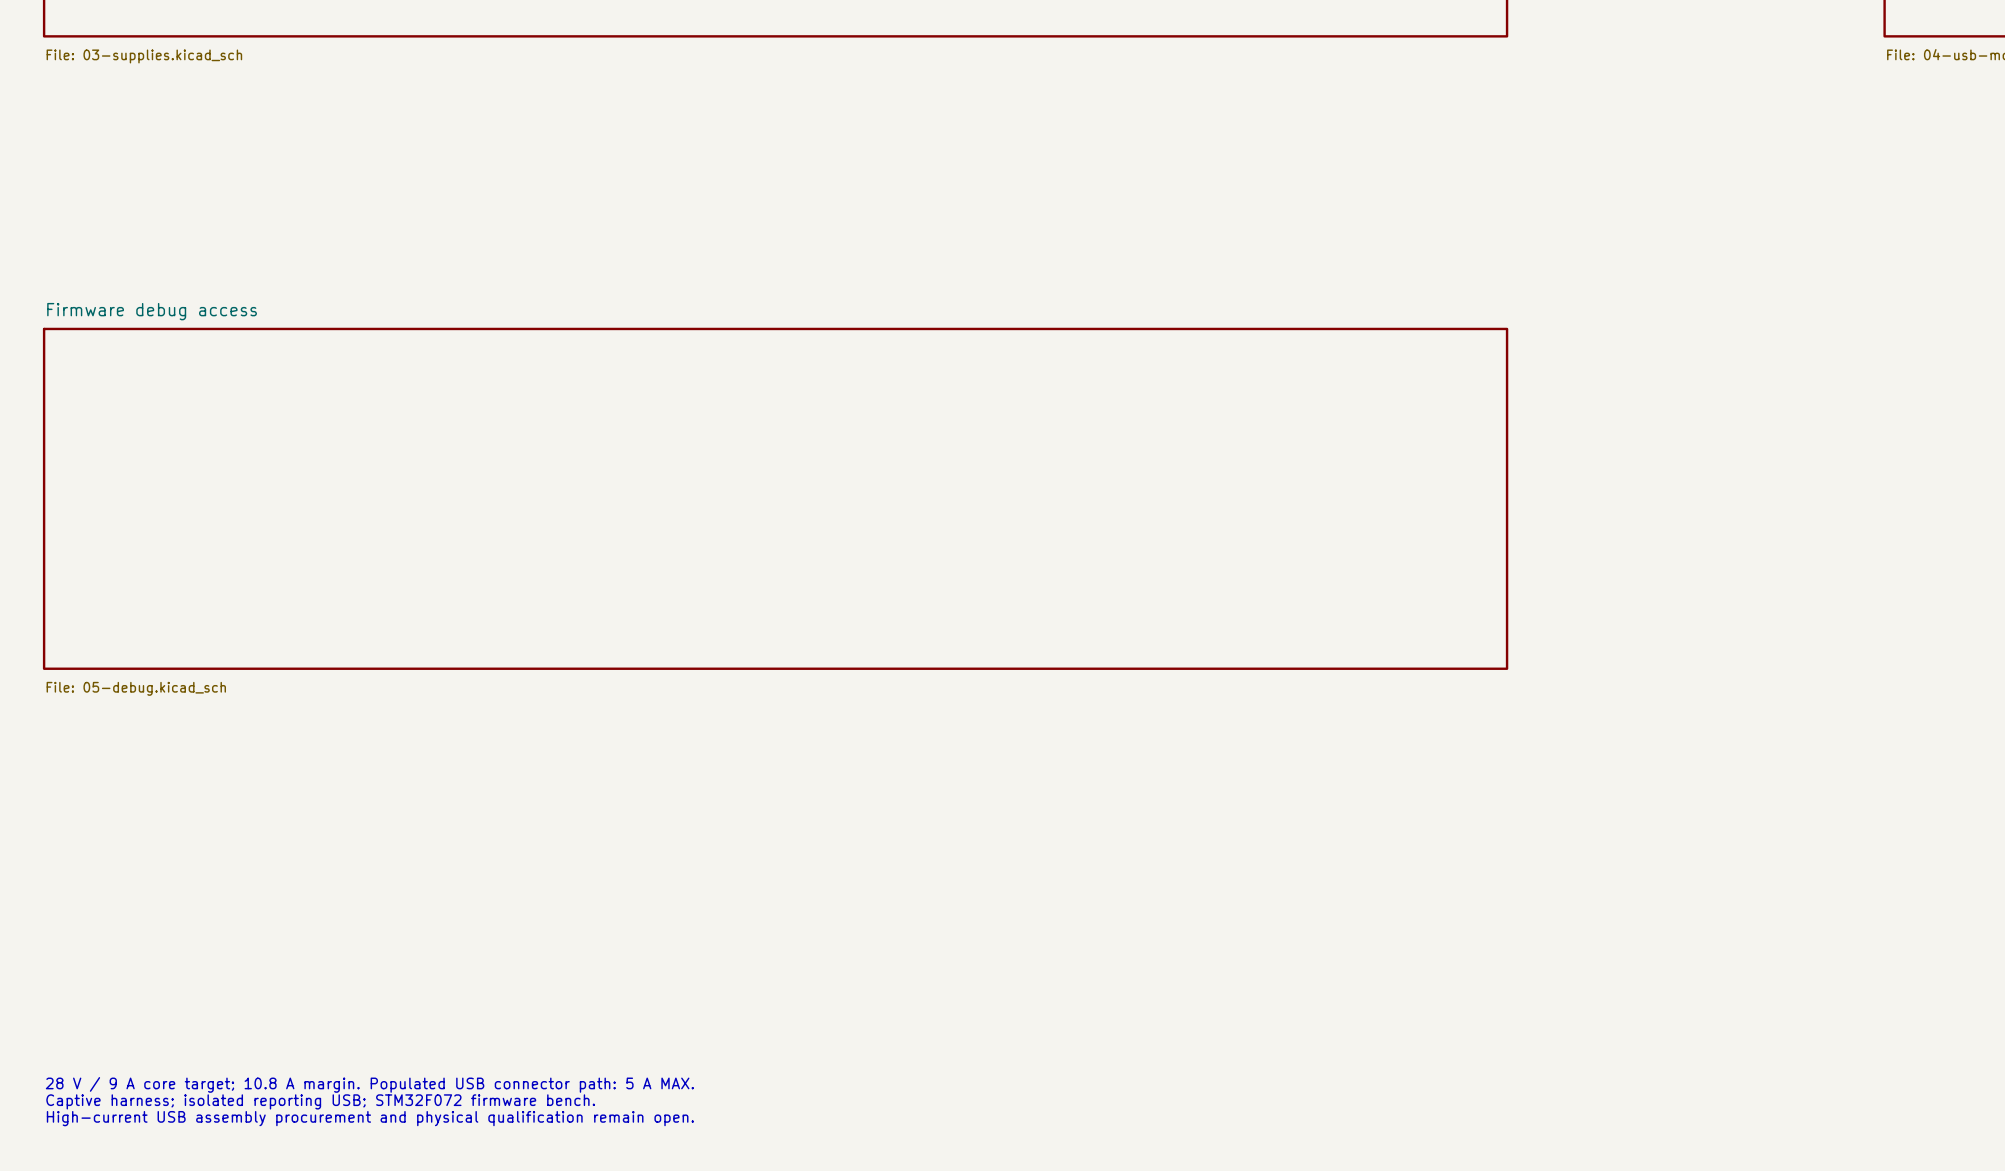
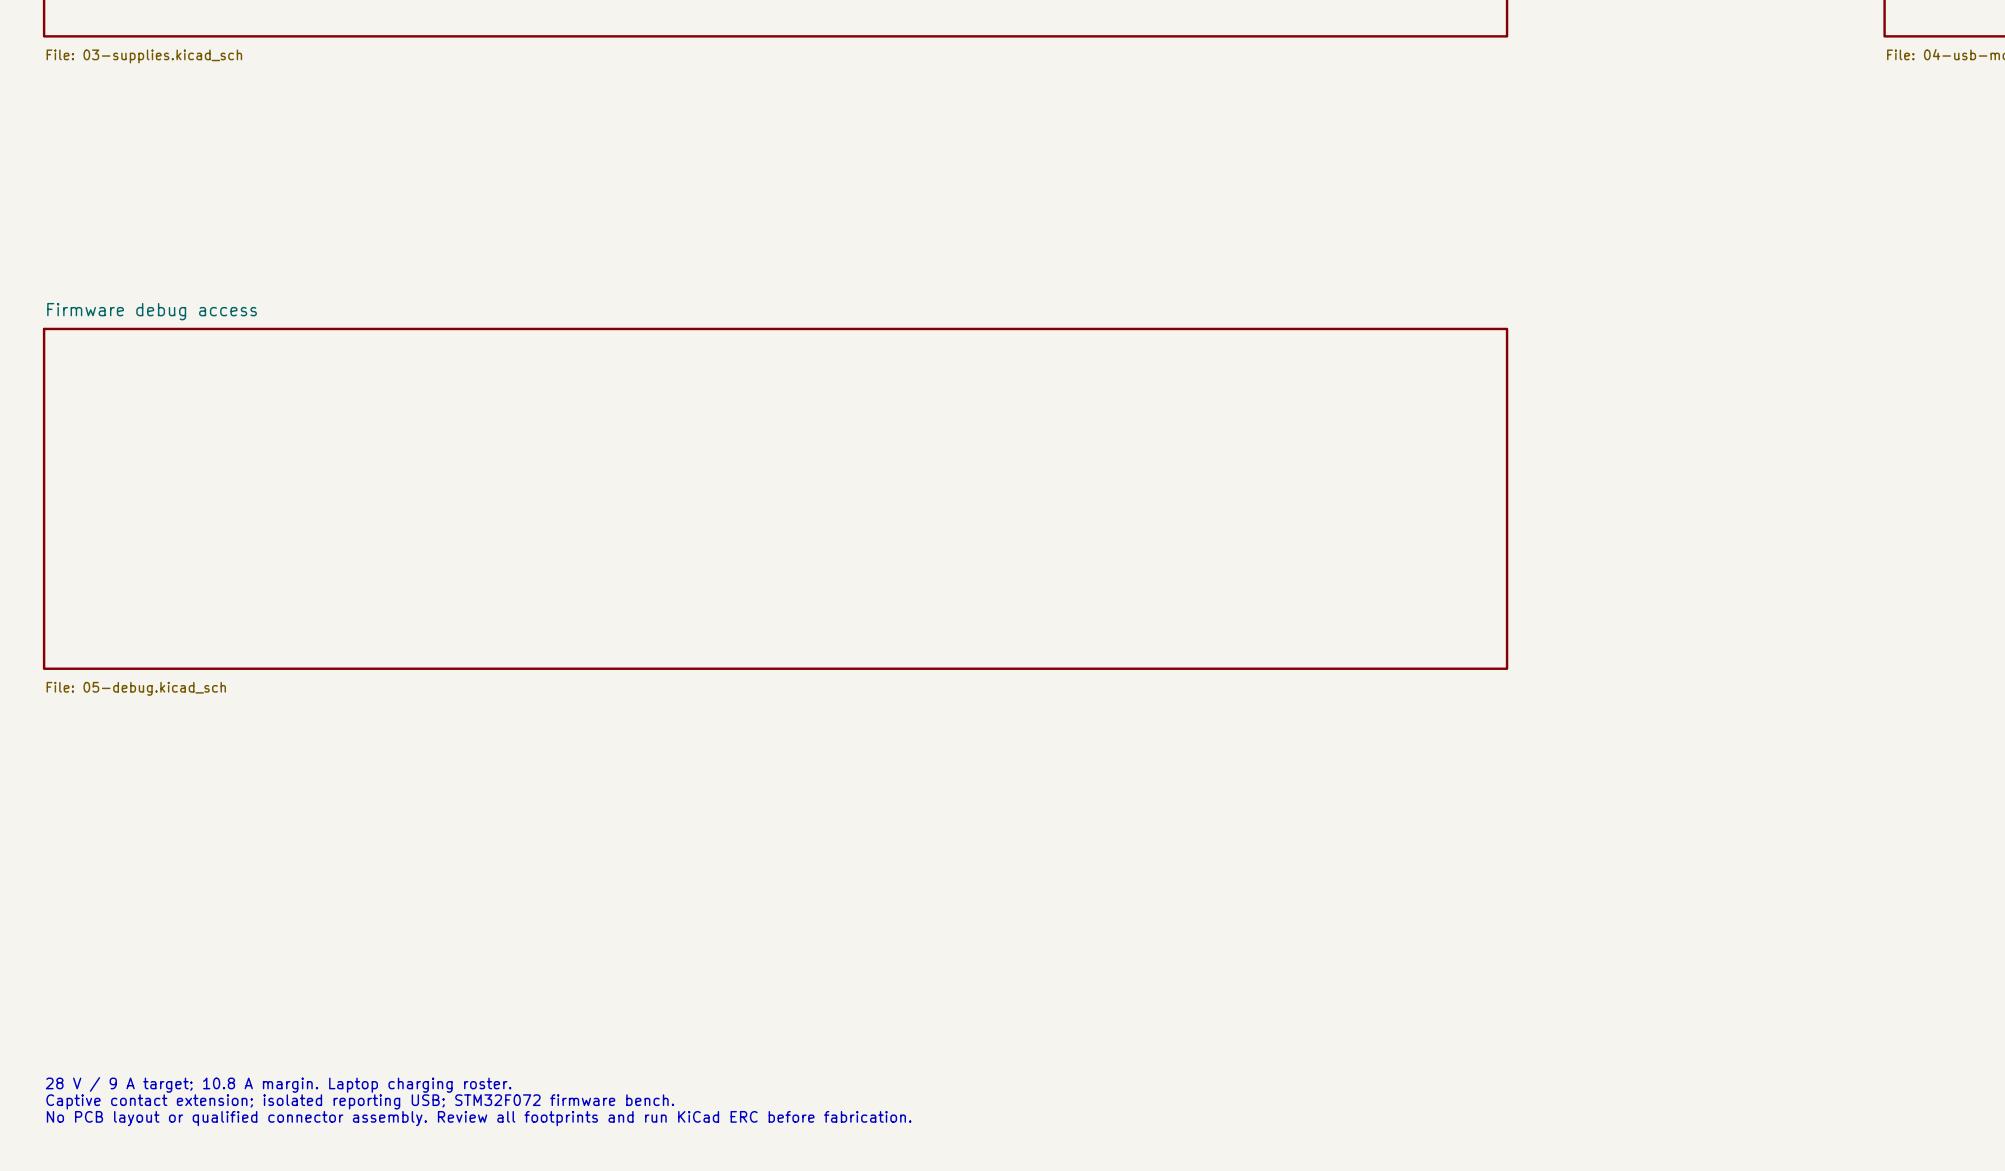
text: 28 V / 9 A core target; 10.8 A margin. Populated USB connector path: 5 A MAX. (369, 1084) -> 28 V / 9 A target; 10.8 A margin. Laptop charging roster. (278, 1084)
text: Captive harness; isolated reporting USB; STM32F072 firmware bench. (320, 1101) -> Captive contact extension; isolated reporting USB; STM32F072 firmware bench. (360, 1101)
text: High-current USB assembly procurement and physical qualification remain open. (370, 1118) -> No PCB layout or qualified connector assembly. Review all footprints and run KiCad ERC before fabrication. (479, 1118)

